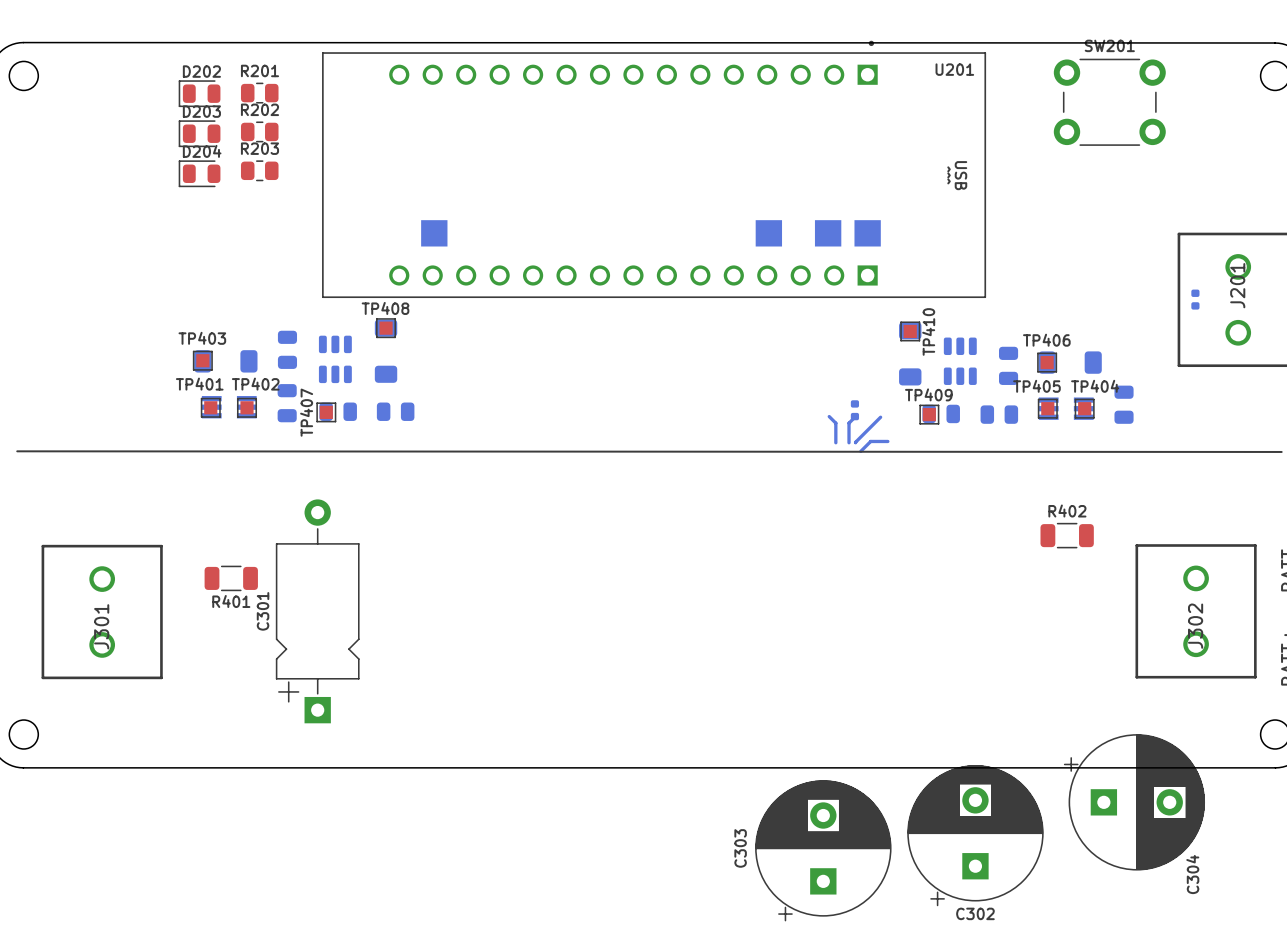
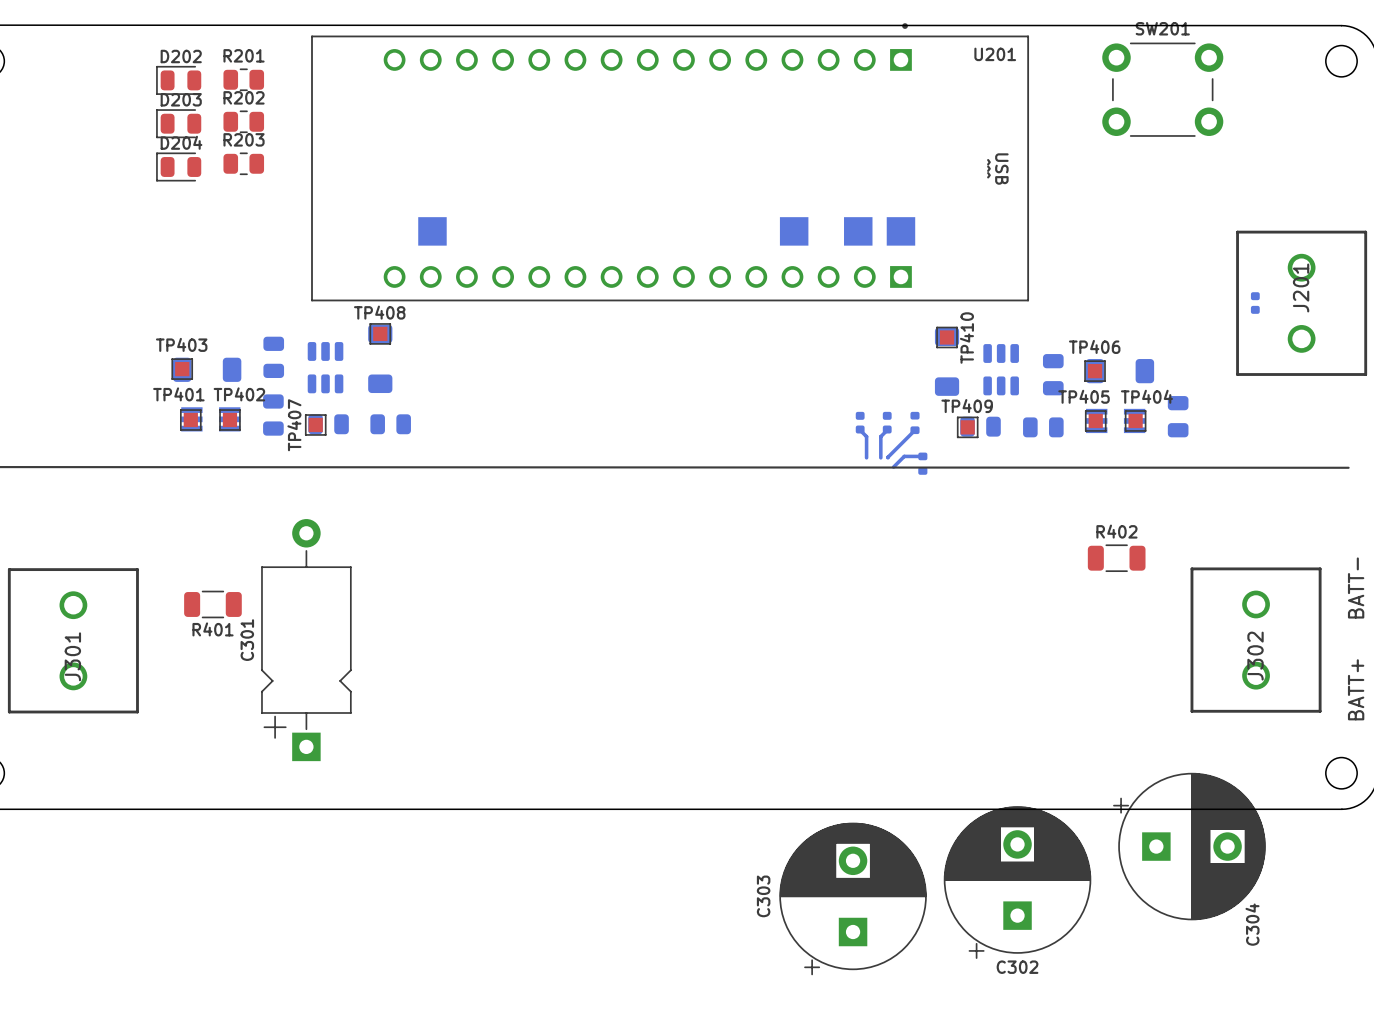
part: none -> (860, 422)
part: none -> (914, 422)
part: none -> (922, 463)

